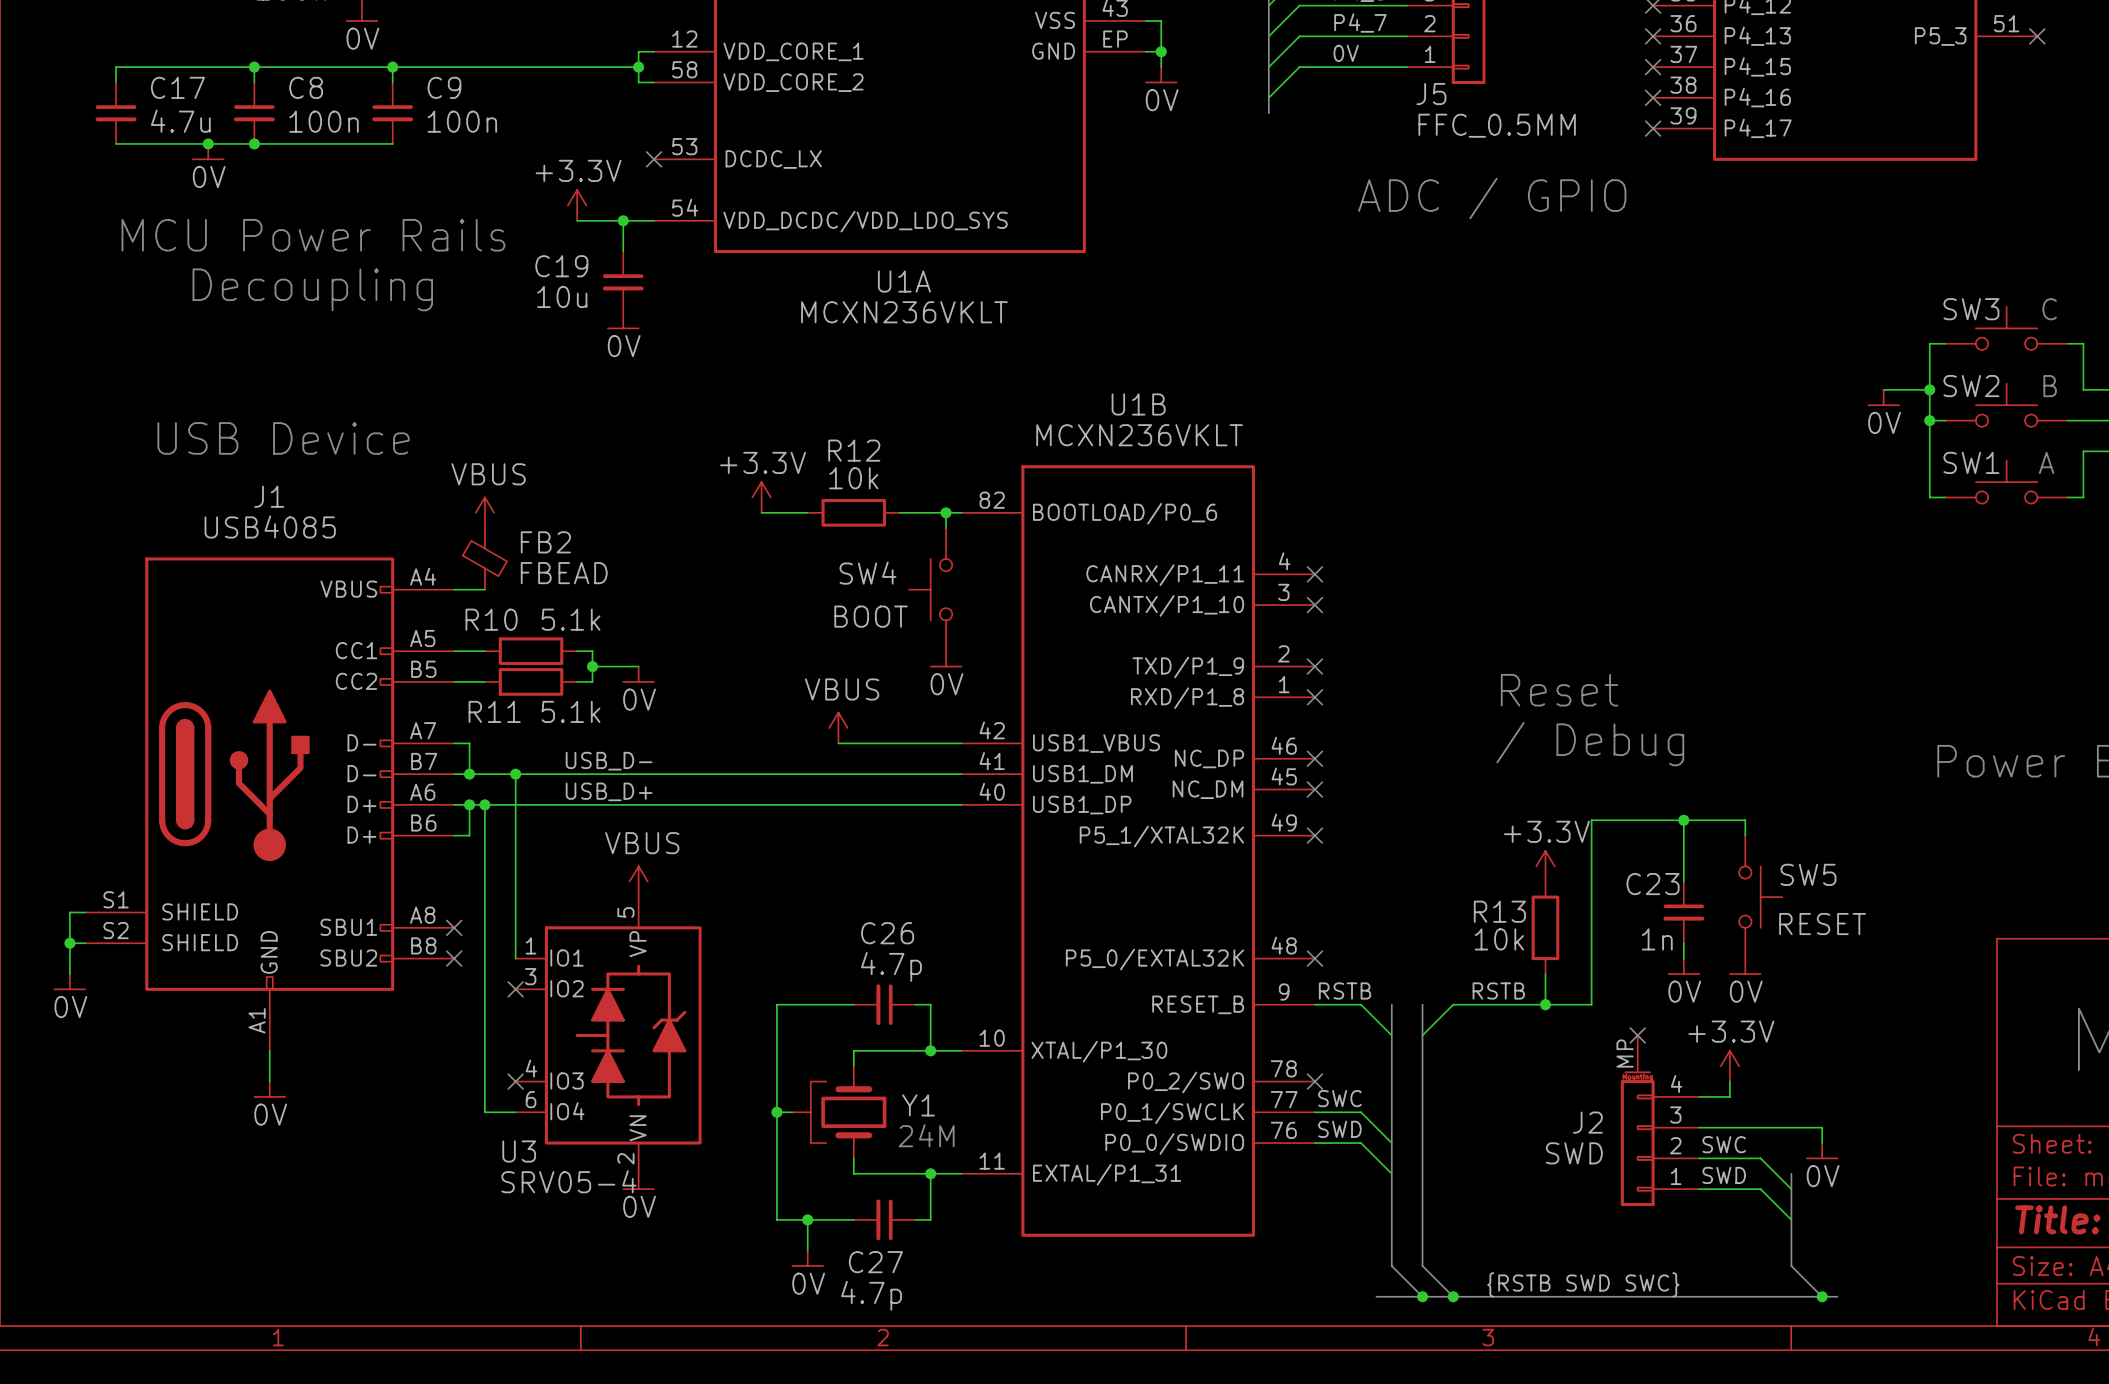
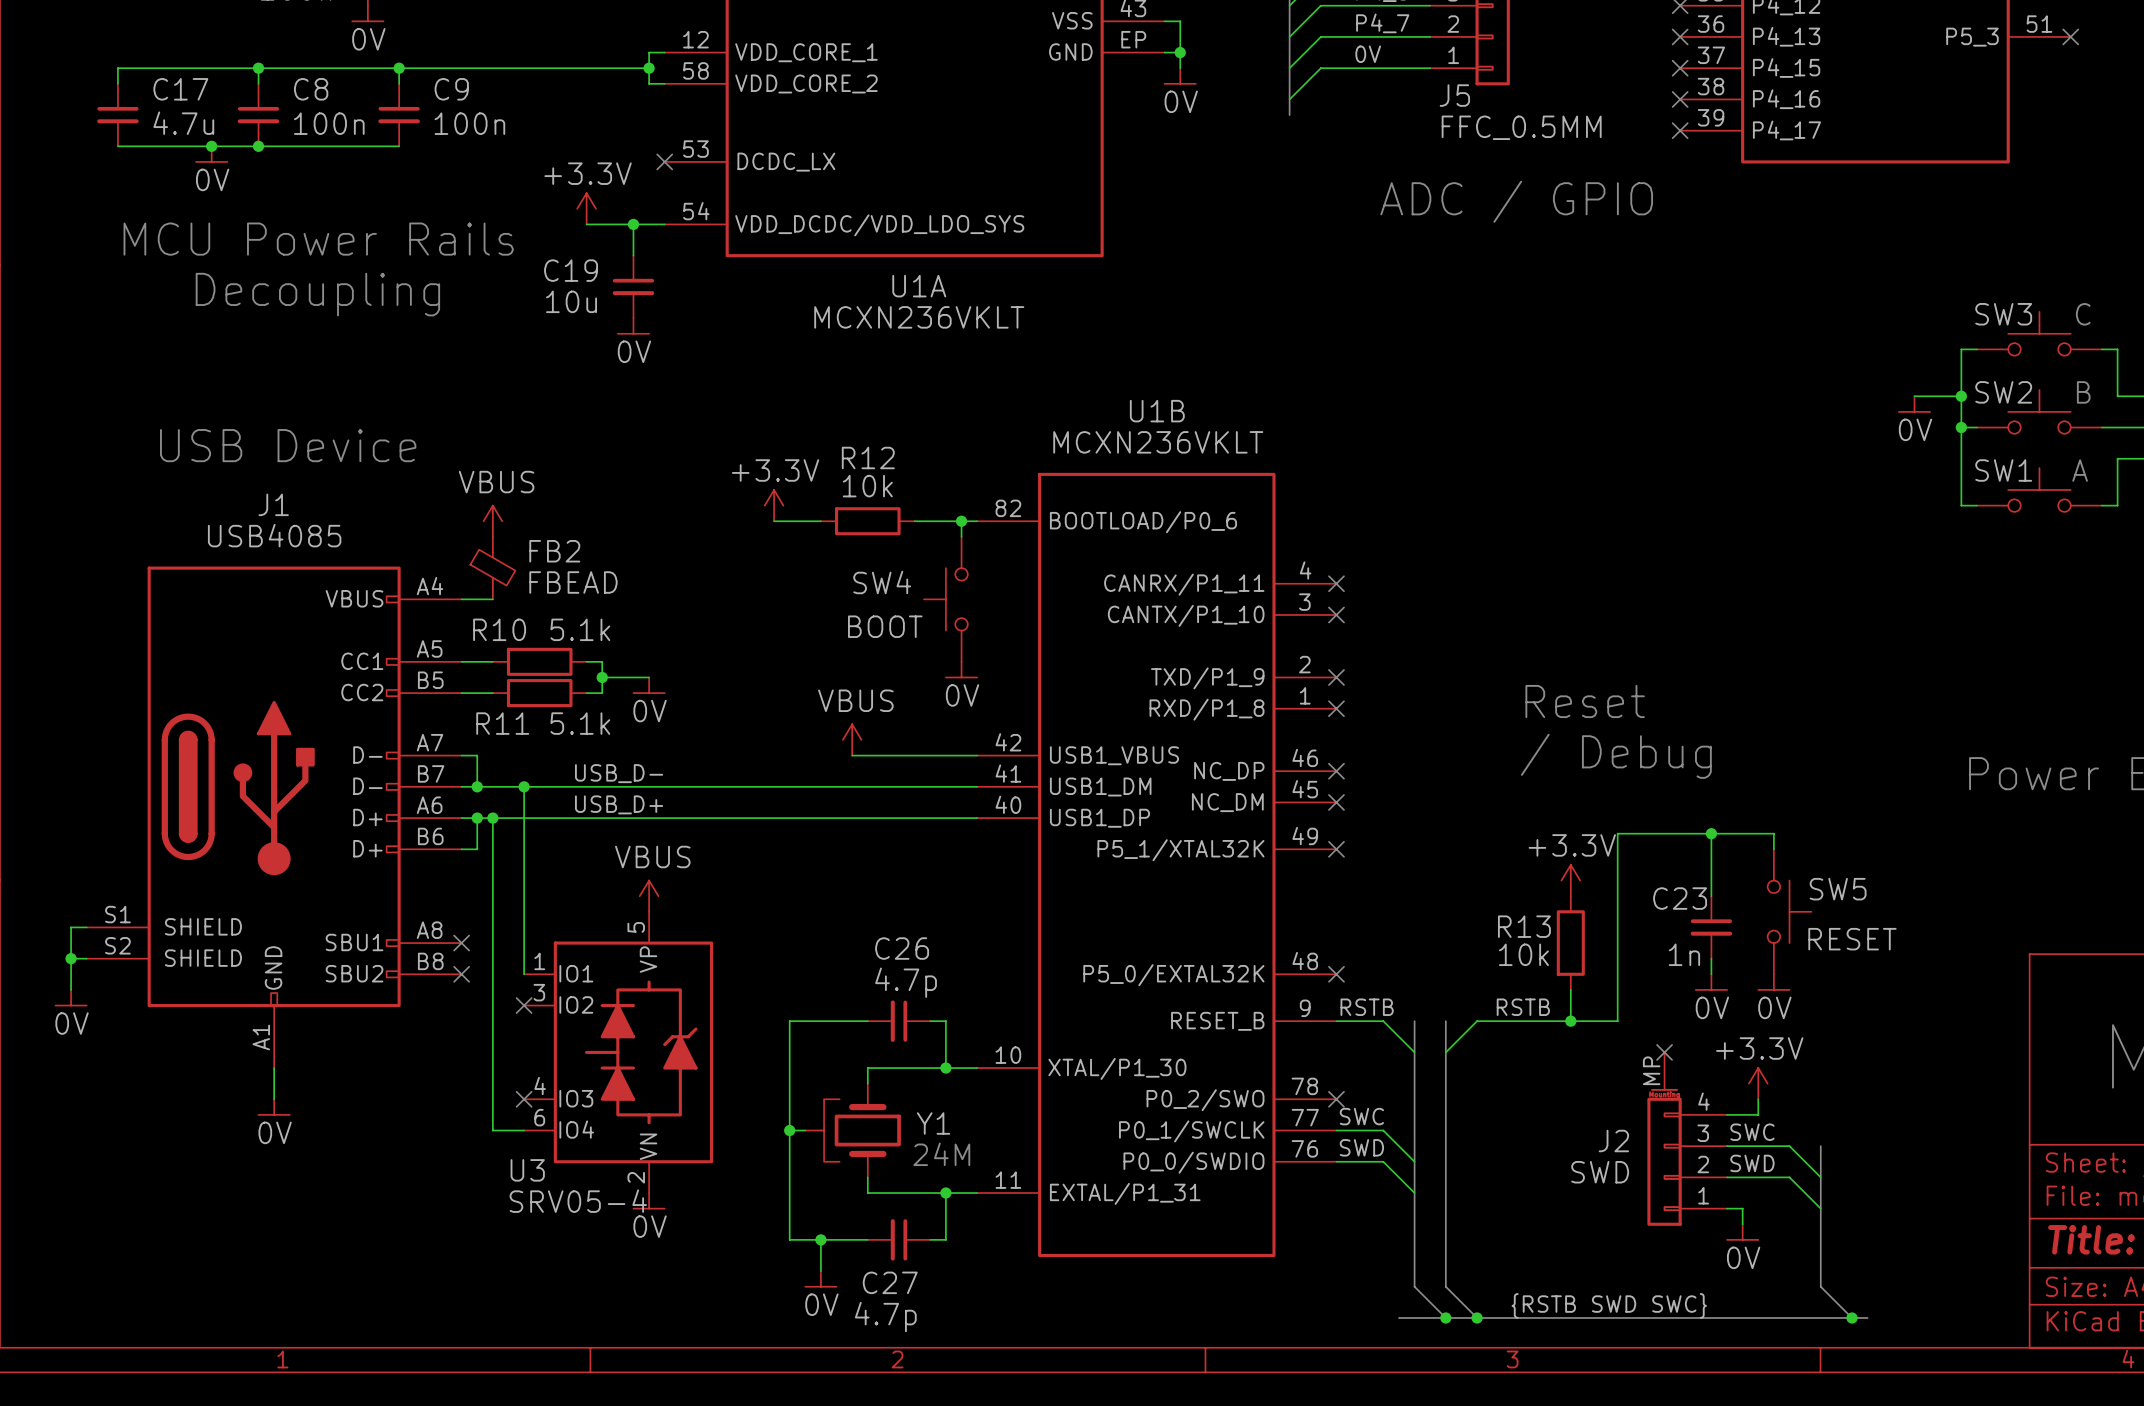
label: none -> SWC (1752, 1132)
wire: (1760, 1127) (1822, 1127) (1822, 1143) -> (1789, 1146) (1820, 1177)
bus: none -> (1820, 1146) (1820, 1193)
label: SWC (1724, 1144) -> SWD (1752, 1163)
power symbol position: 0V (1822, 1150) -> 0V (1742, 1232)
label: SWD (1724, 1175) -> none
wire: (1714, 1189) (1760, 1189) (1791, 1219) -> (1742, 1208) (1742, 1224)

